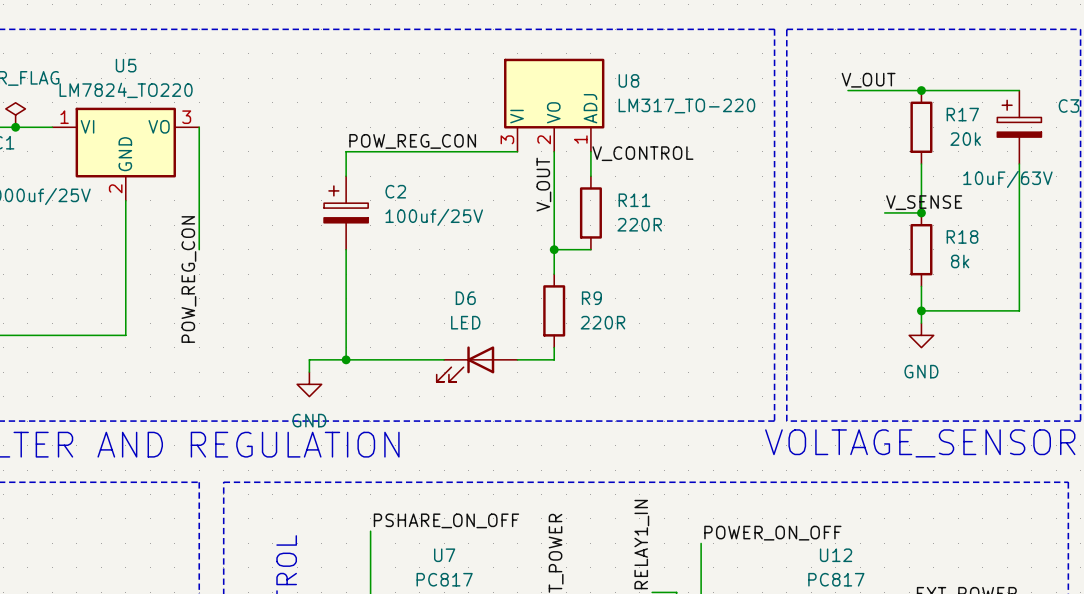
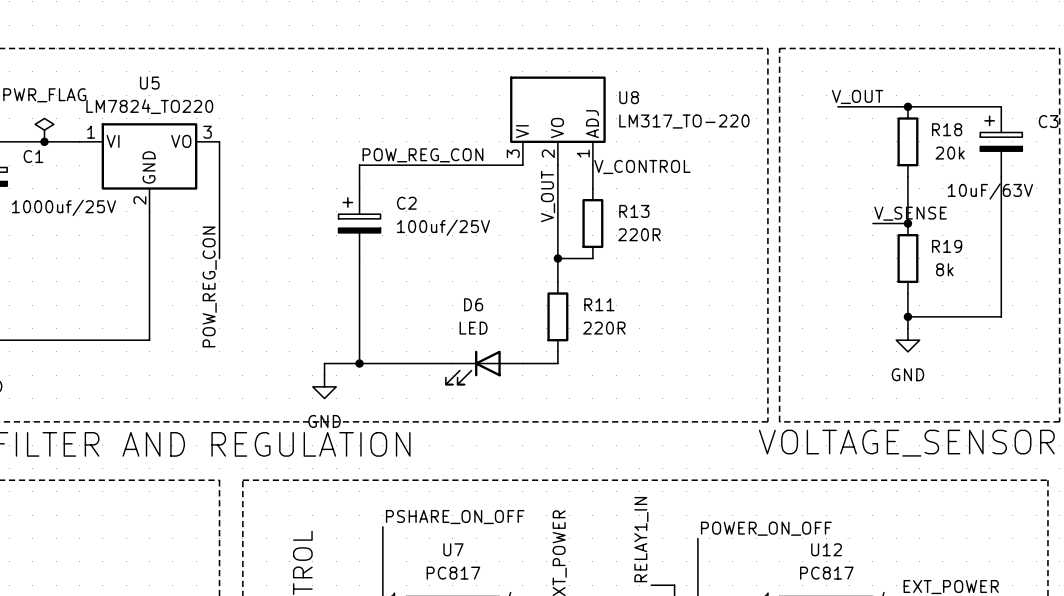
R17 name: R17 (962, 114) -> R18 (947, 129)
R11 name: R11 (634, 200) -> R13 (634, 211)
R18 name: R18 (962, 236) -> R19 (947, 246)
R9 name: R9 (591, 298) -> R11 (599, 304)

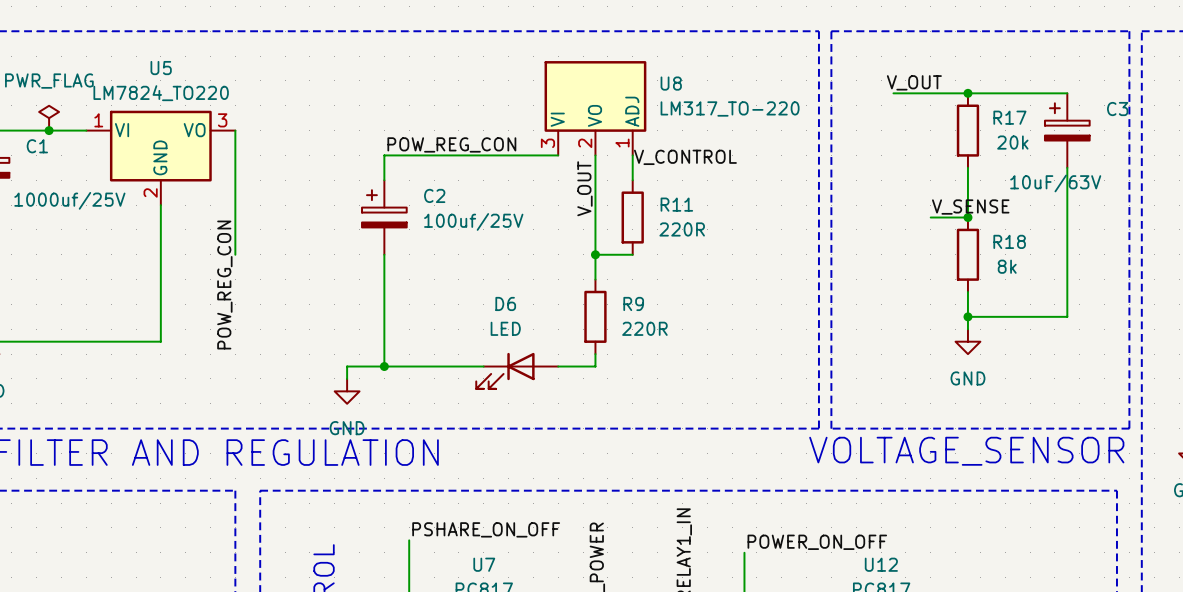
R18 name: R18 (947, 129) -> R17 (1009, 117)
R13 name: R13 (634, 211) -> R11 (676, 204)
R19 name: R19 (947, 246) -> R18 (1009, 241)
R11 name: R11 (599, 304) -> R9 (633, 303)

